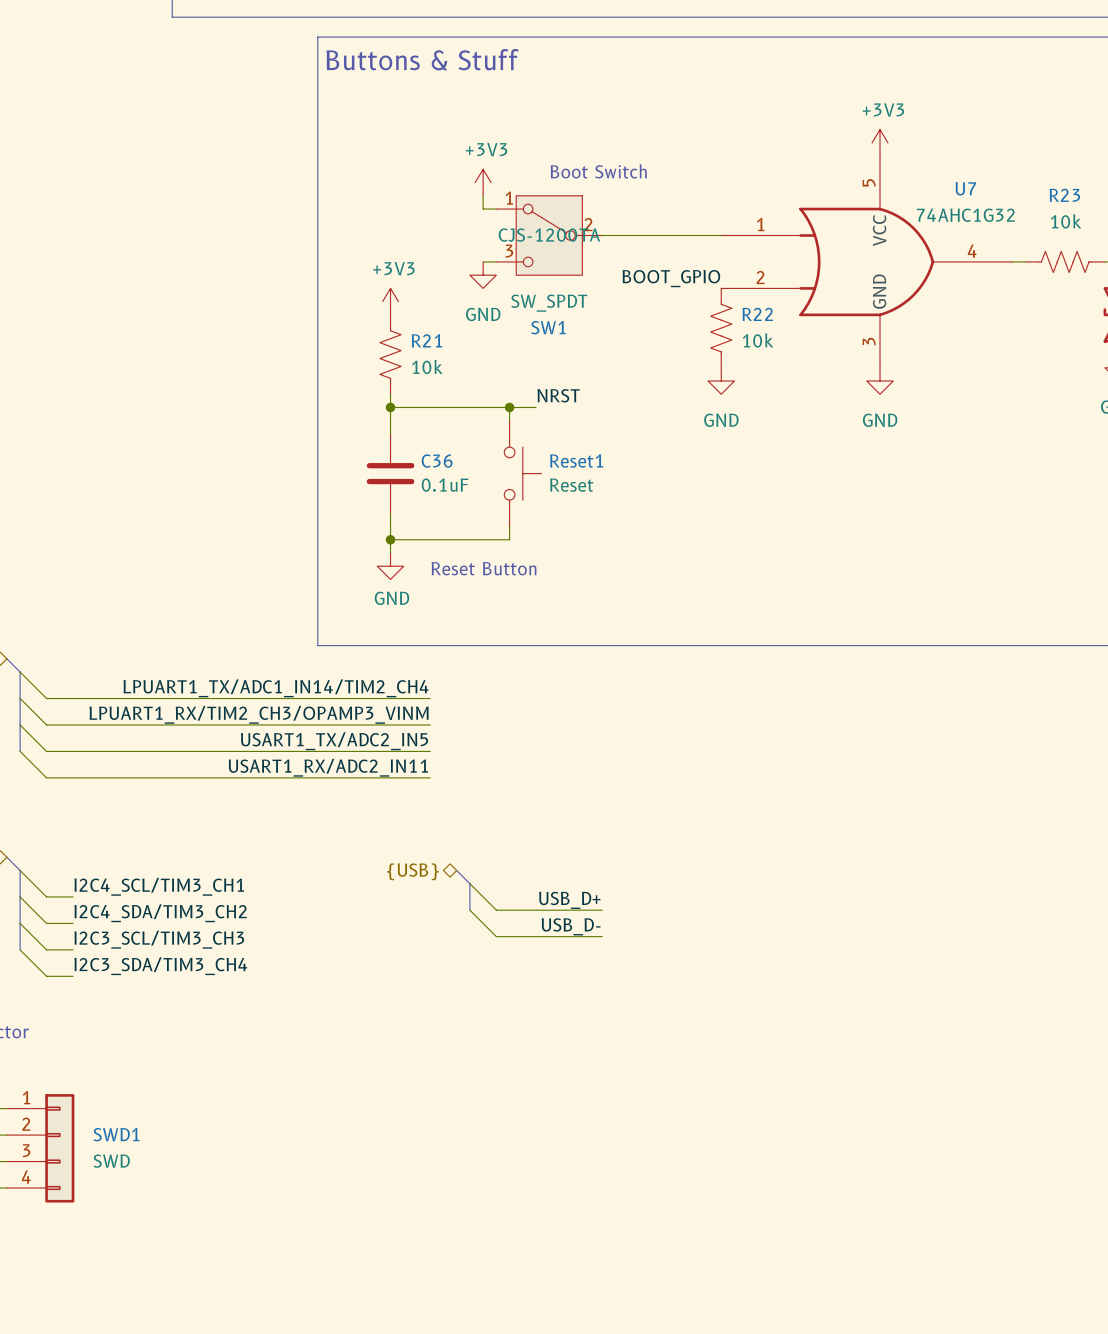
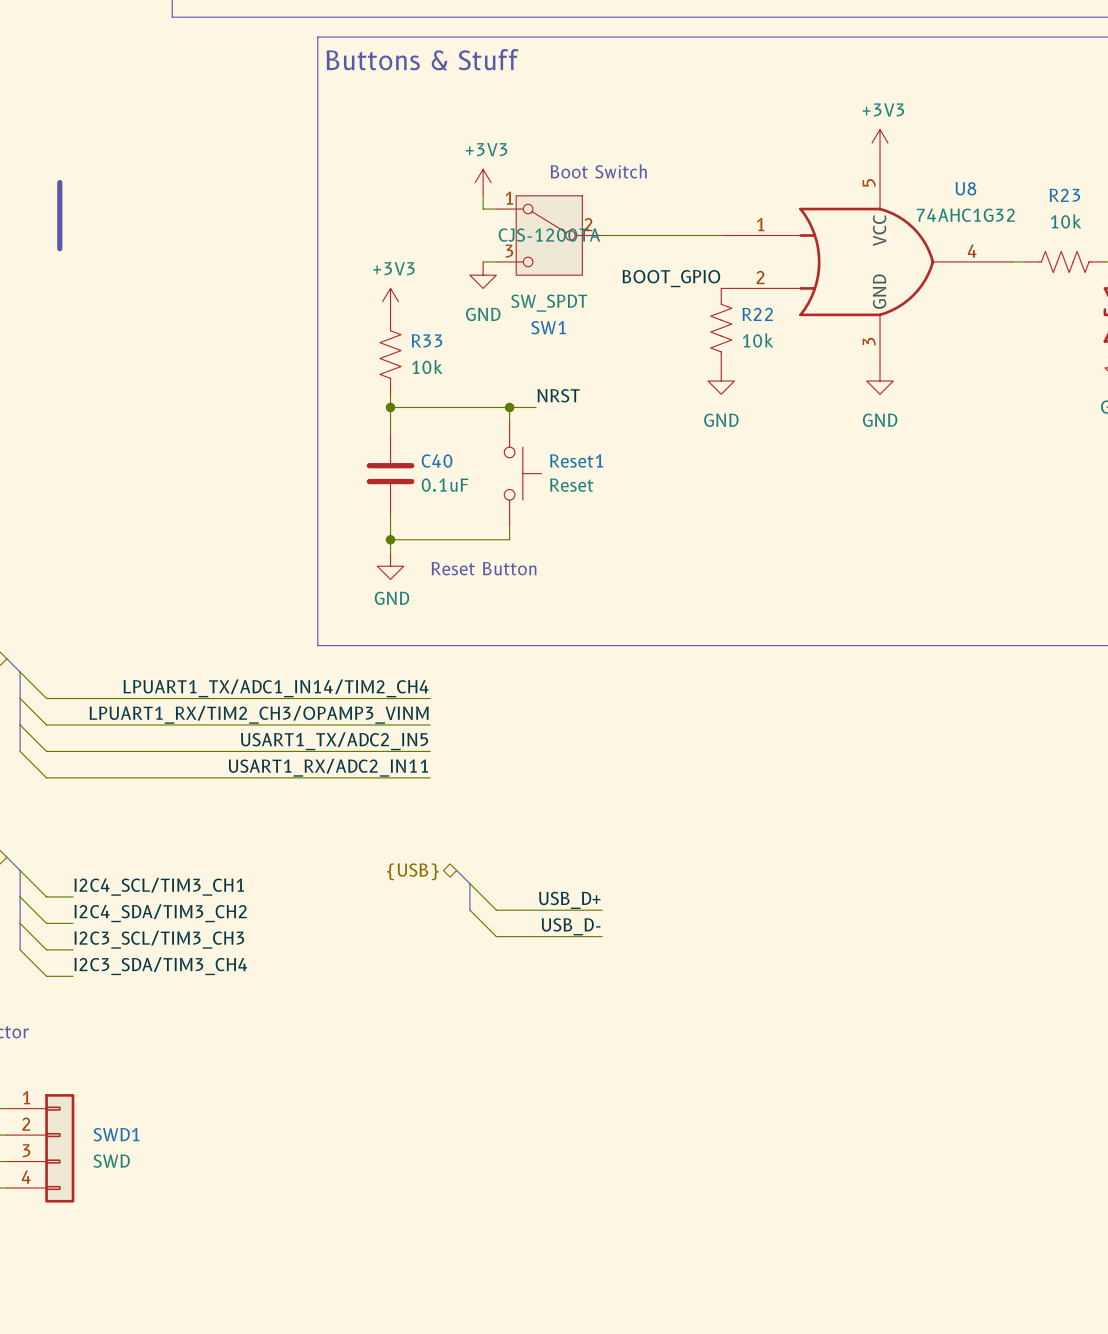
line: none -> (59, 182) (59, 248)
U7 name: U7 (965, 188) -> U8 (965, 188)
R21 name: R21 (426, 340) -> R33 (426, 340)
C36 name: C36 (437, 461) -> C40 (437, 461)

